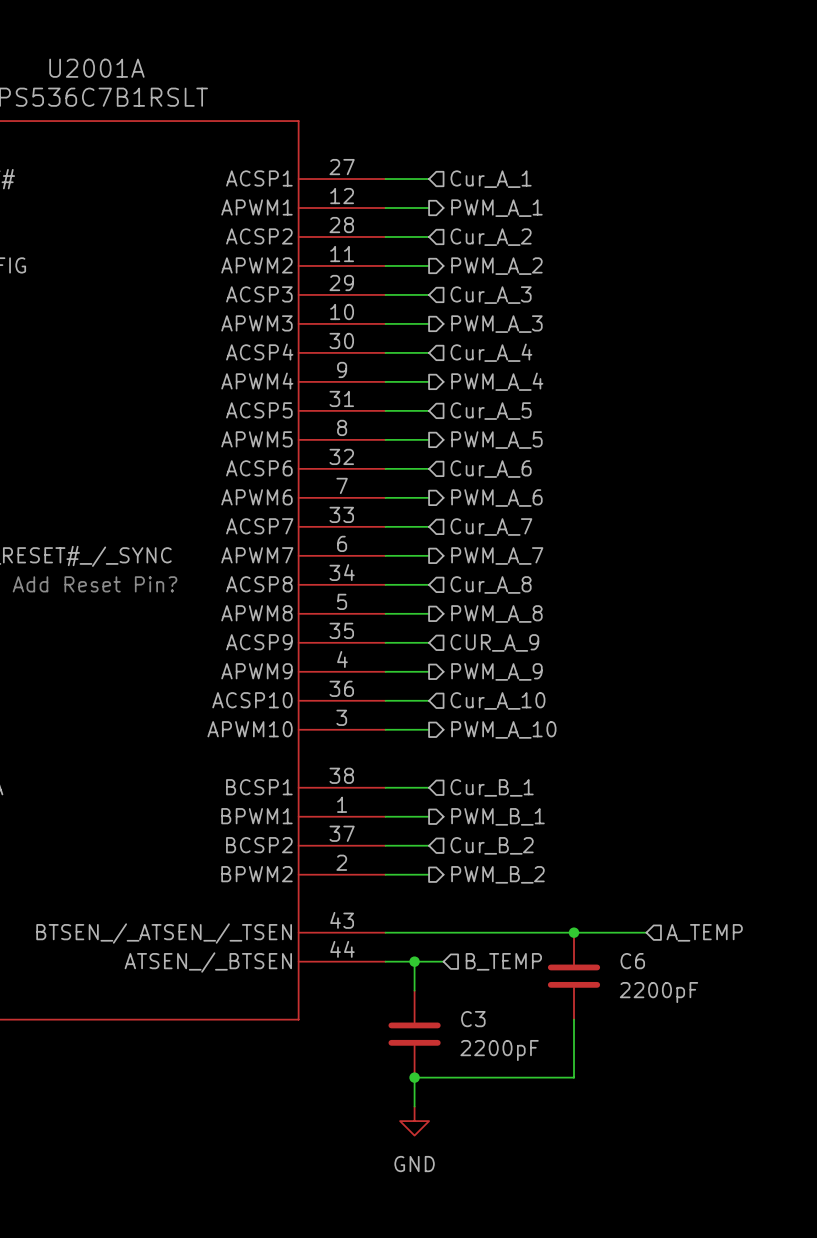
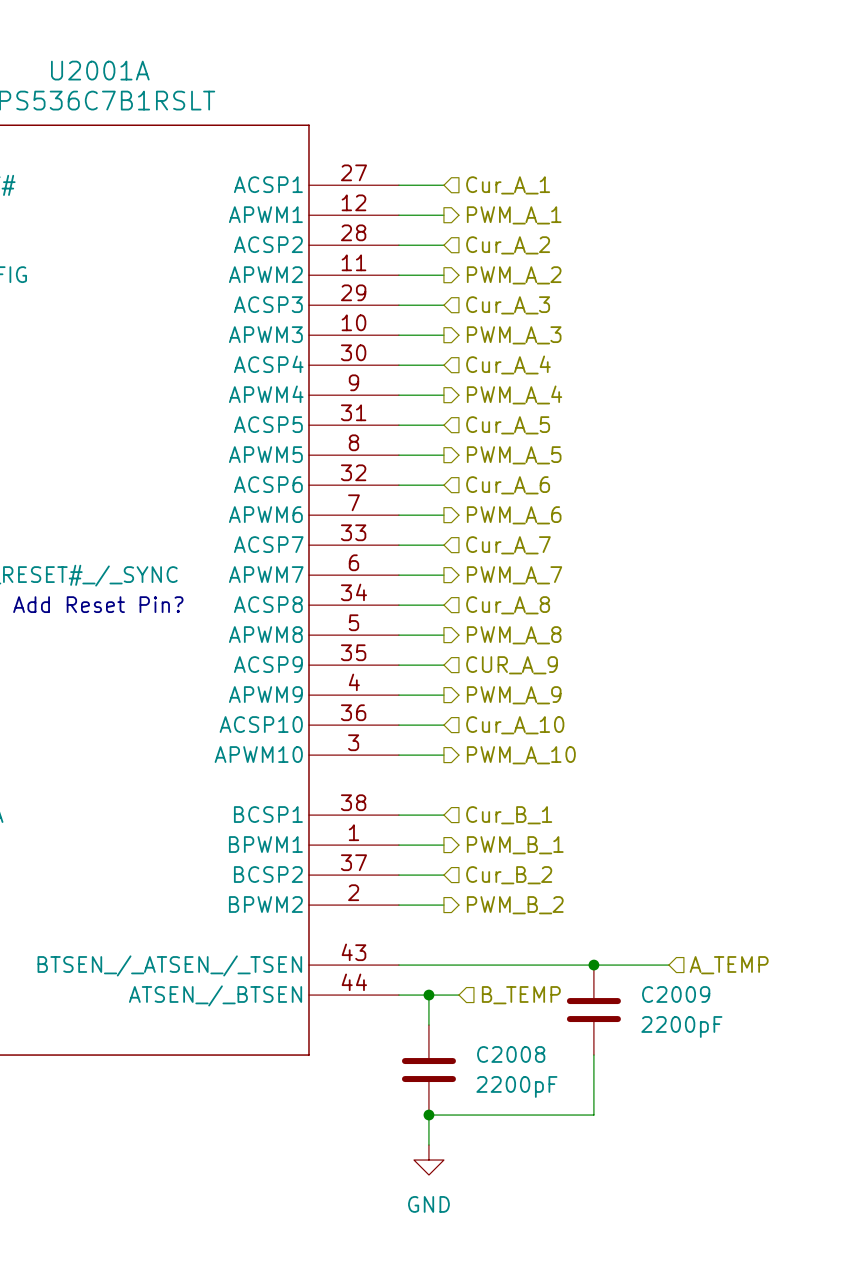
C6 name: C6 (632, 961) -> C2009 (676, 994)
C3 name: C3 (473, 1019) -> C2008 (511, 1054)

